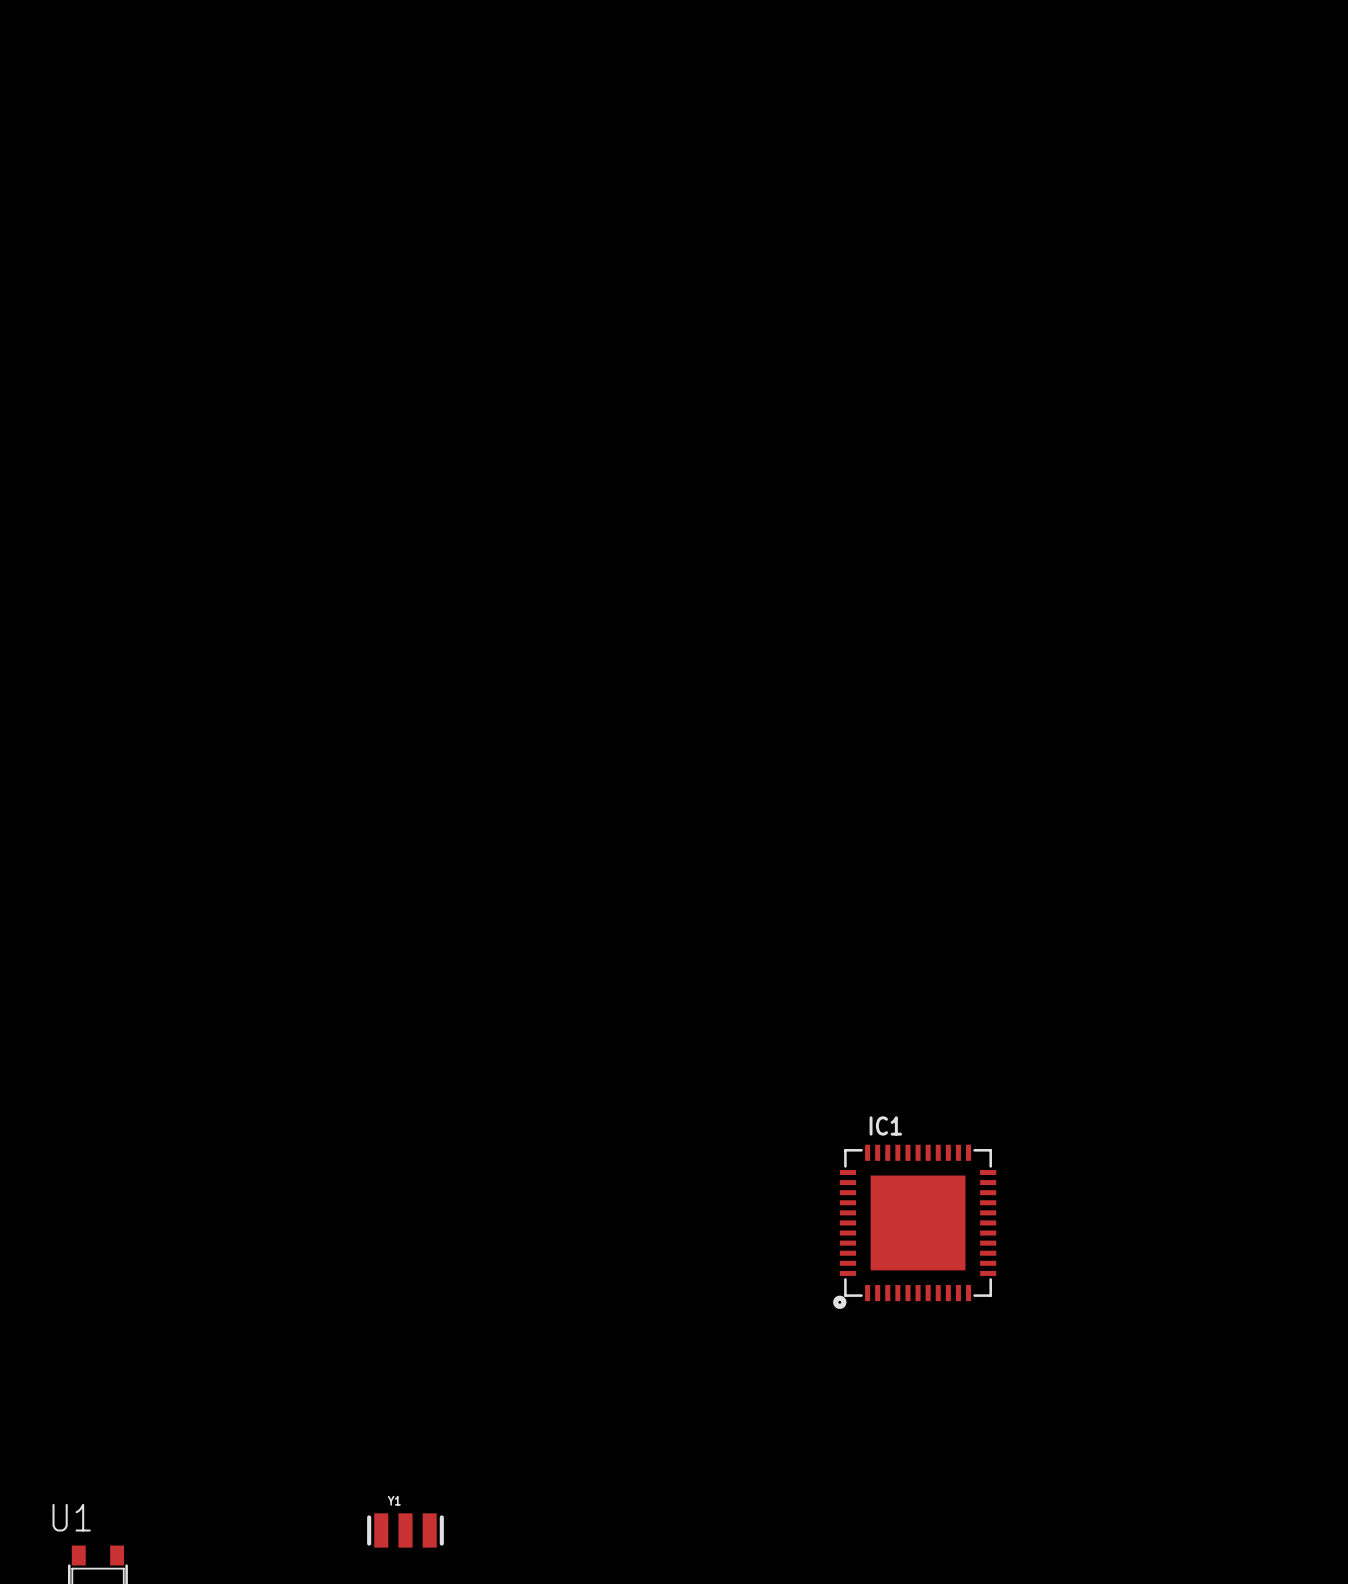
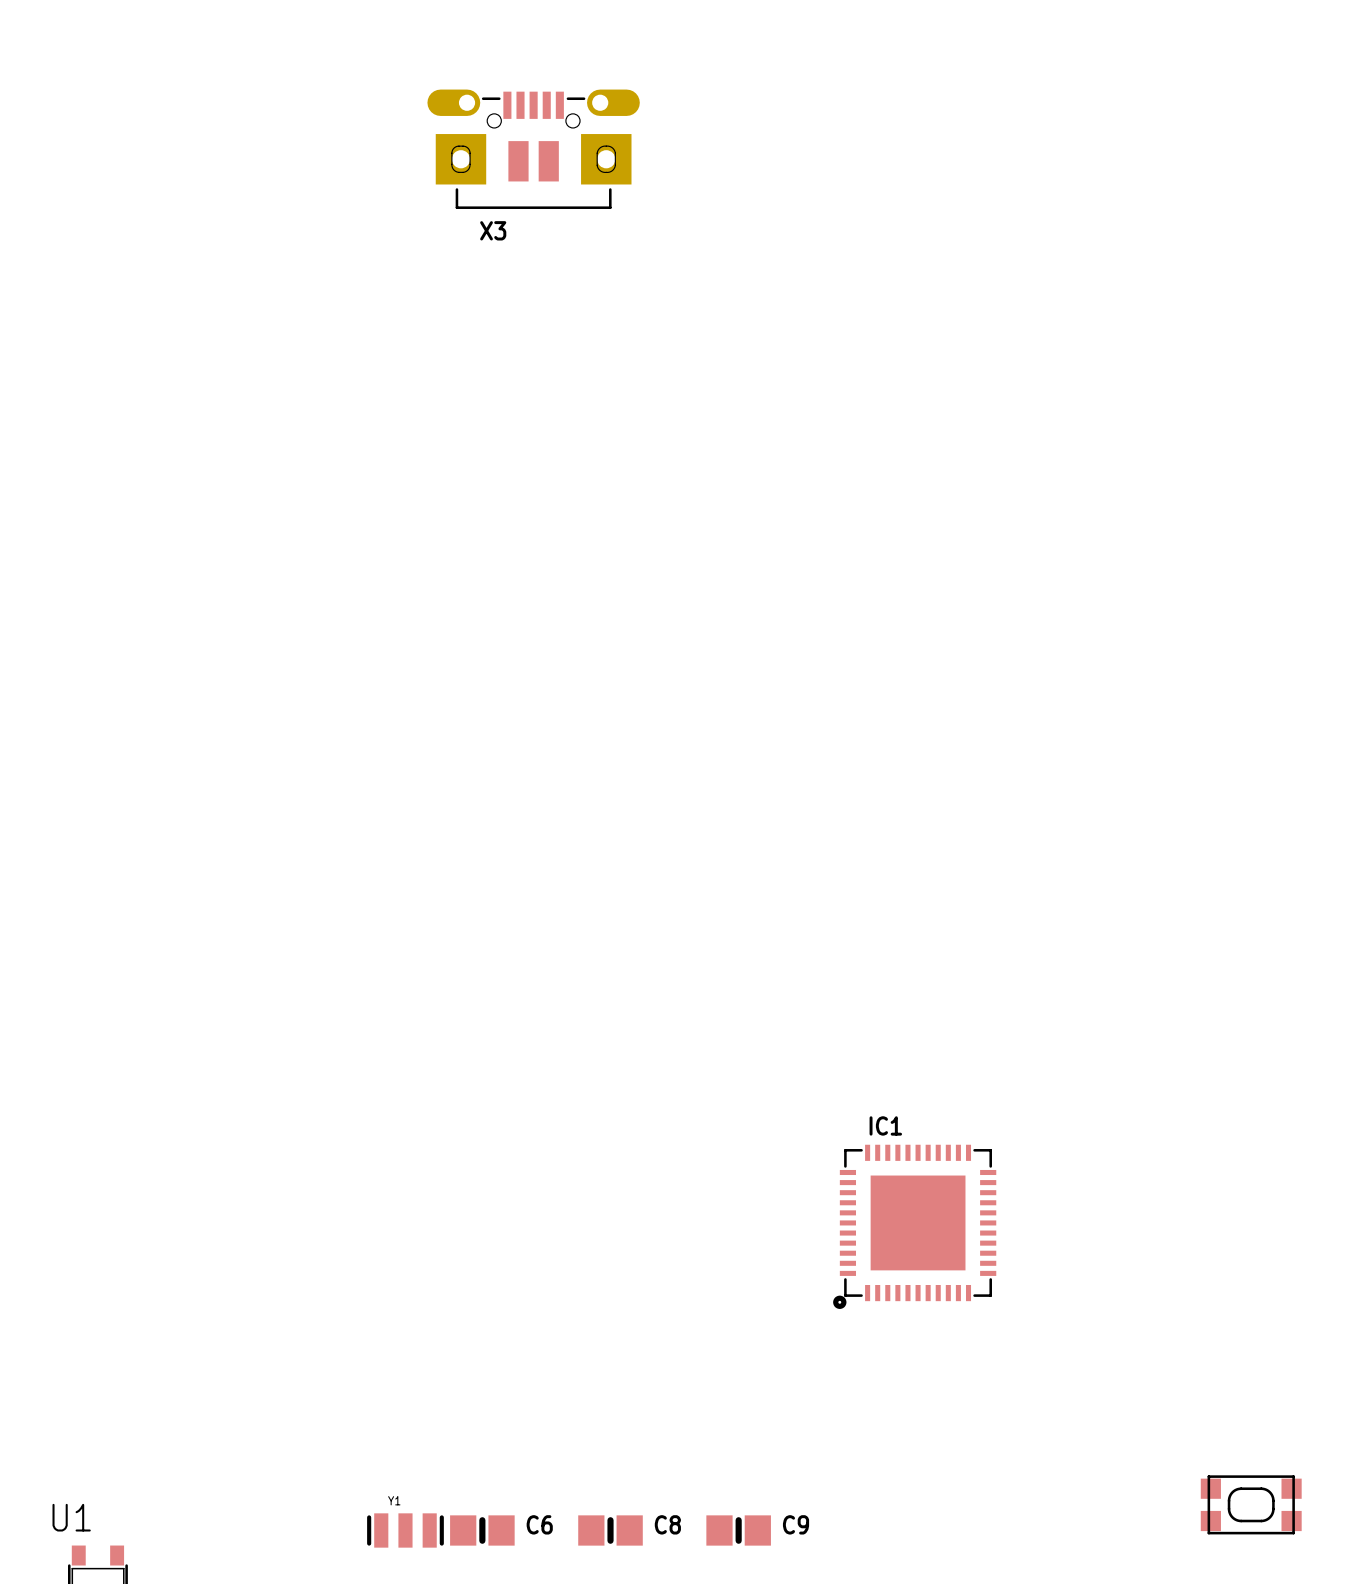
X3: none -> (533, 149)
part: none -> (1251, 1504)
C6: none -> (482, 1530)
C8: none -> (610, 1530)
C9: none -> (738, 1530)

